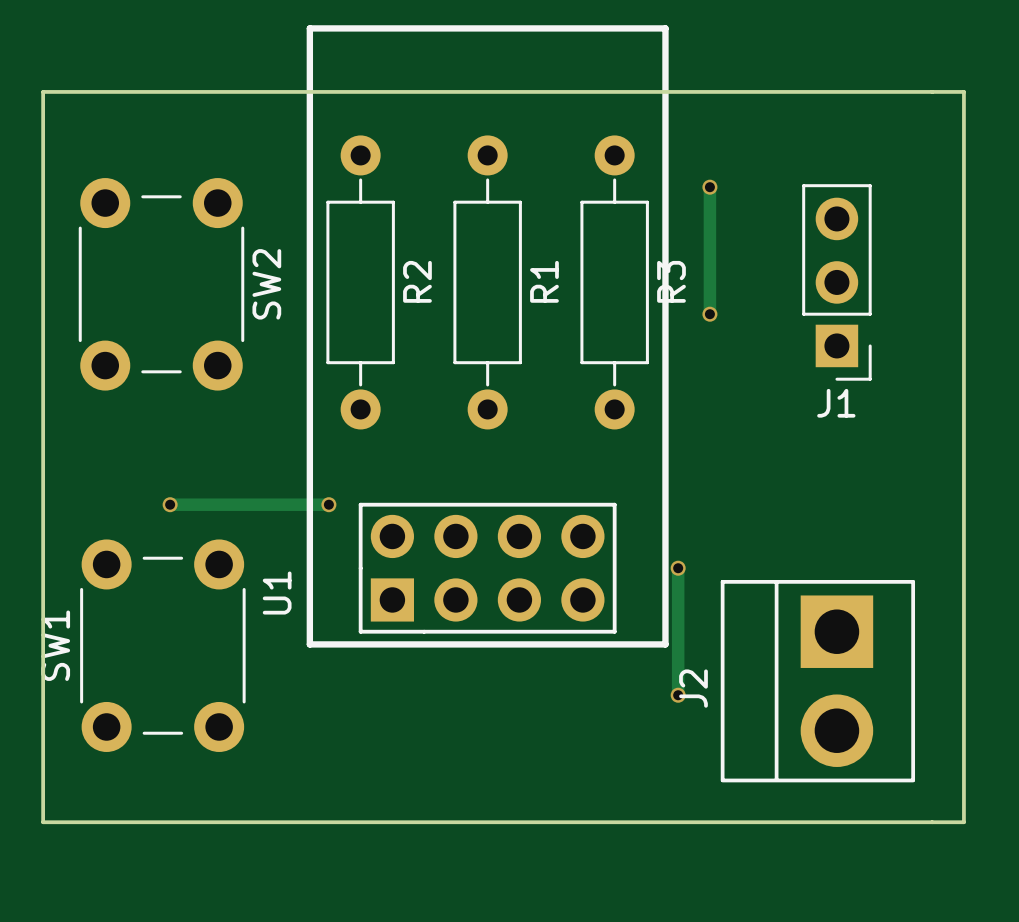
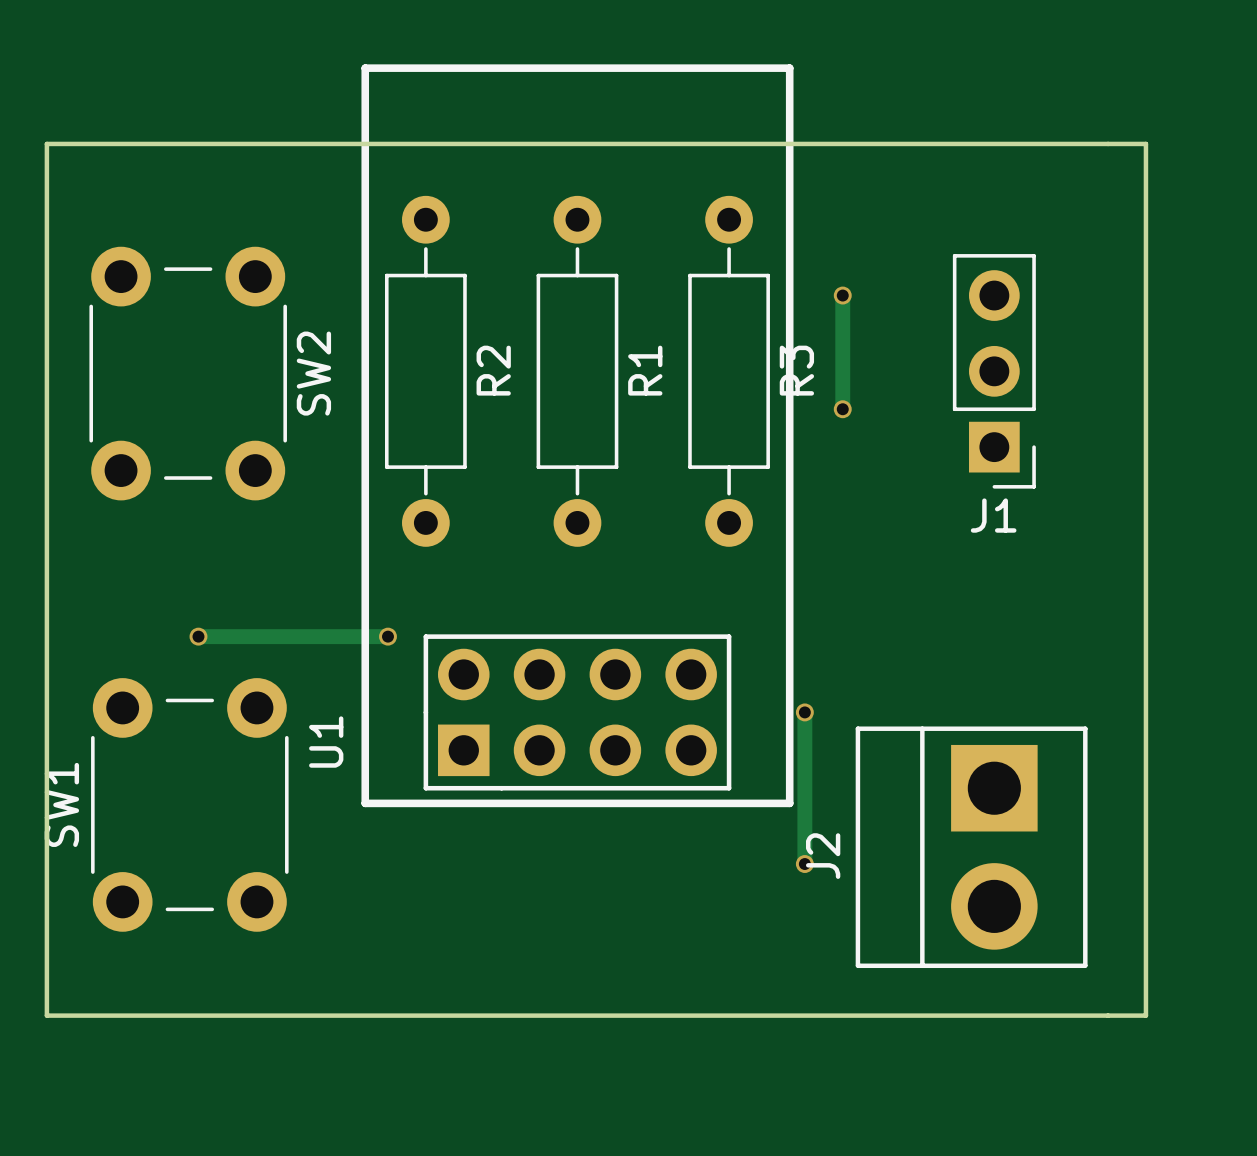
track: (709, 187) (709, 218) -> none
via position: (709, 187) -> (842, 295)

